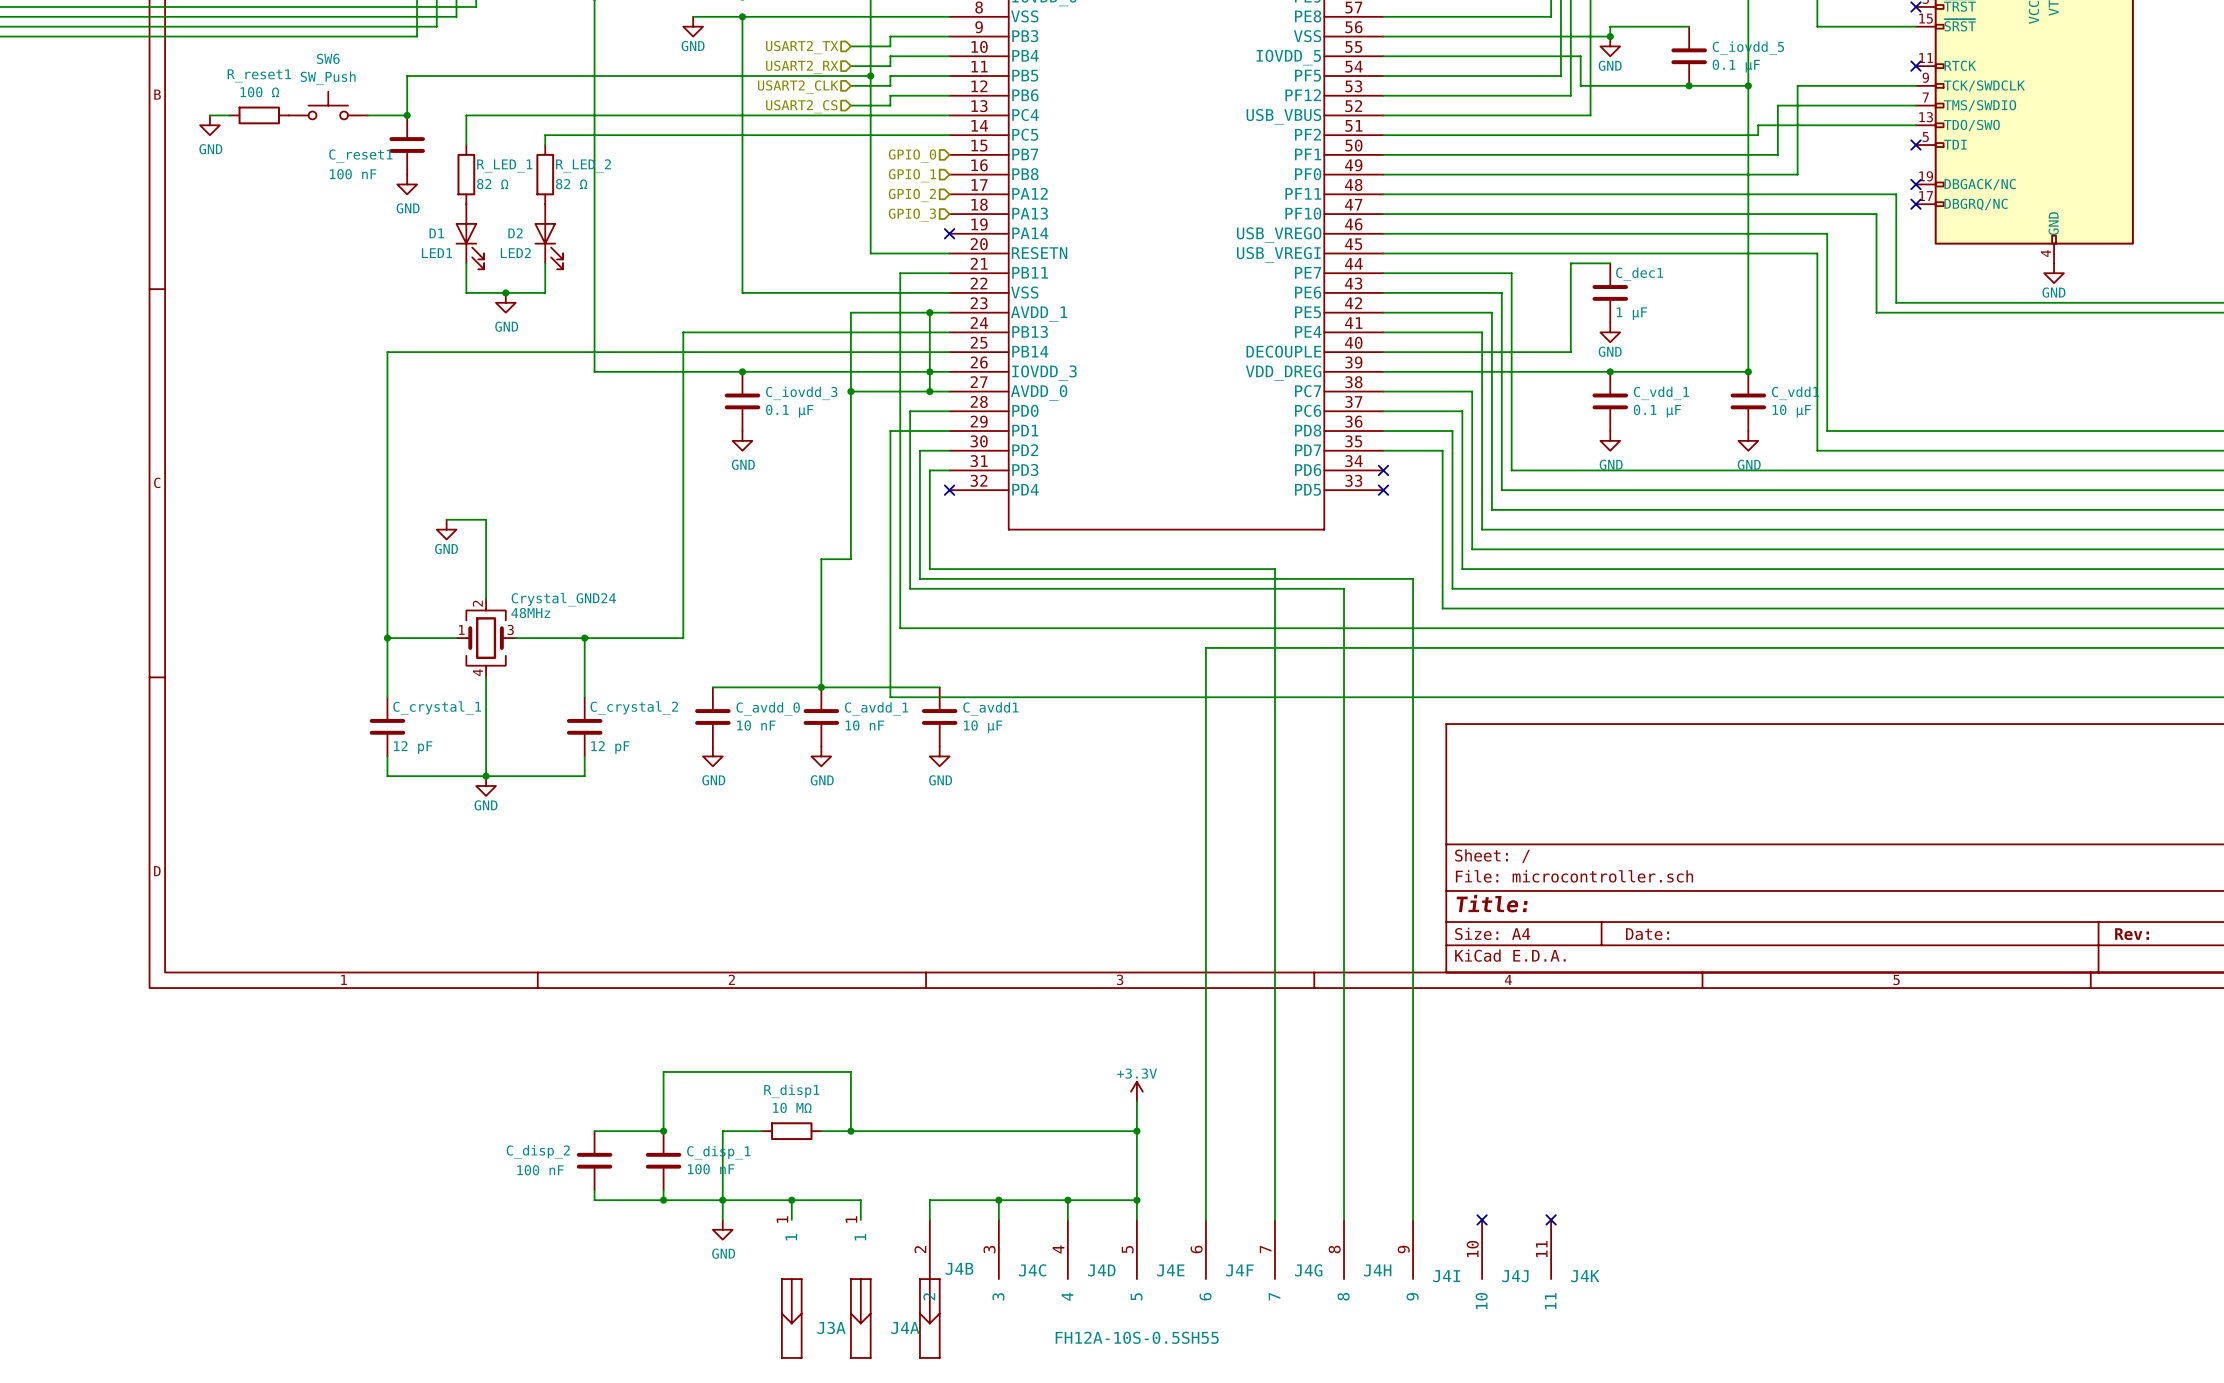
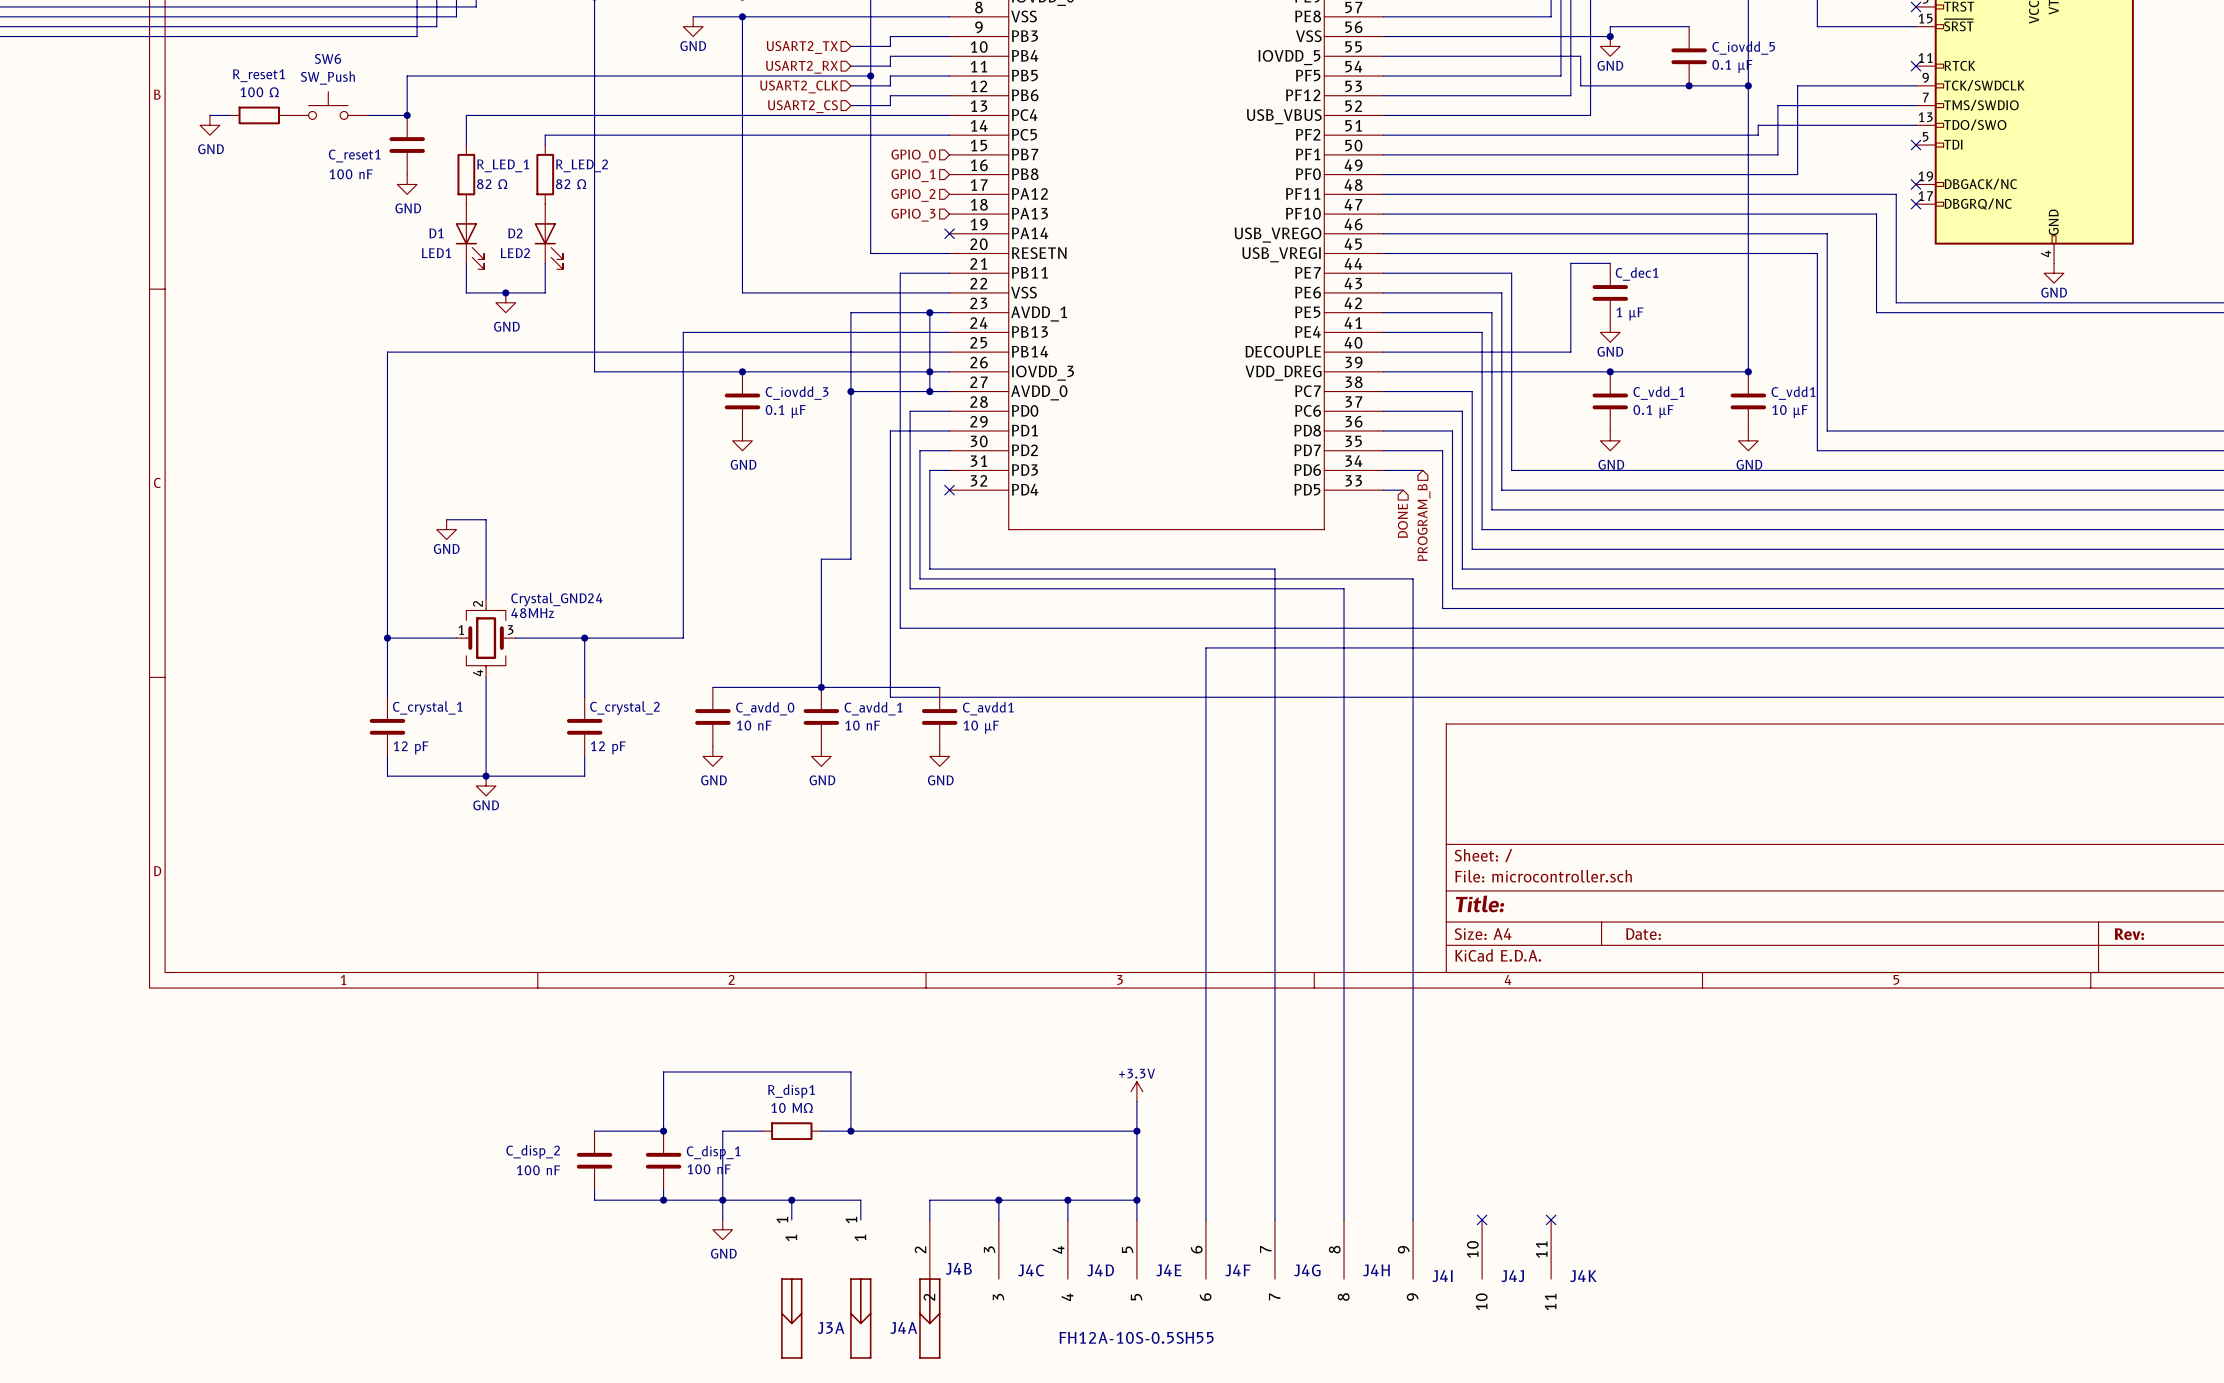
wire: none -> (1383, 470) (1422, 470)
no-connect mark: (1383, 470) -> none
wire: none -> (1383, 490) (1403, 490)
no-connect mark: (1383, 490) -> none
hierarchical label: none -> DONE (1402, 520)
hierarchical label: none -> PROGRAM_B (1424, 522)

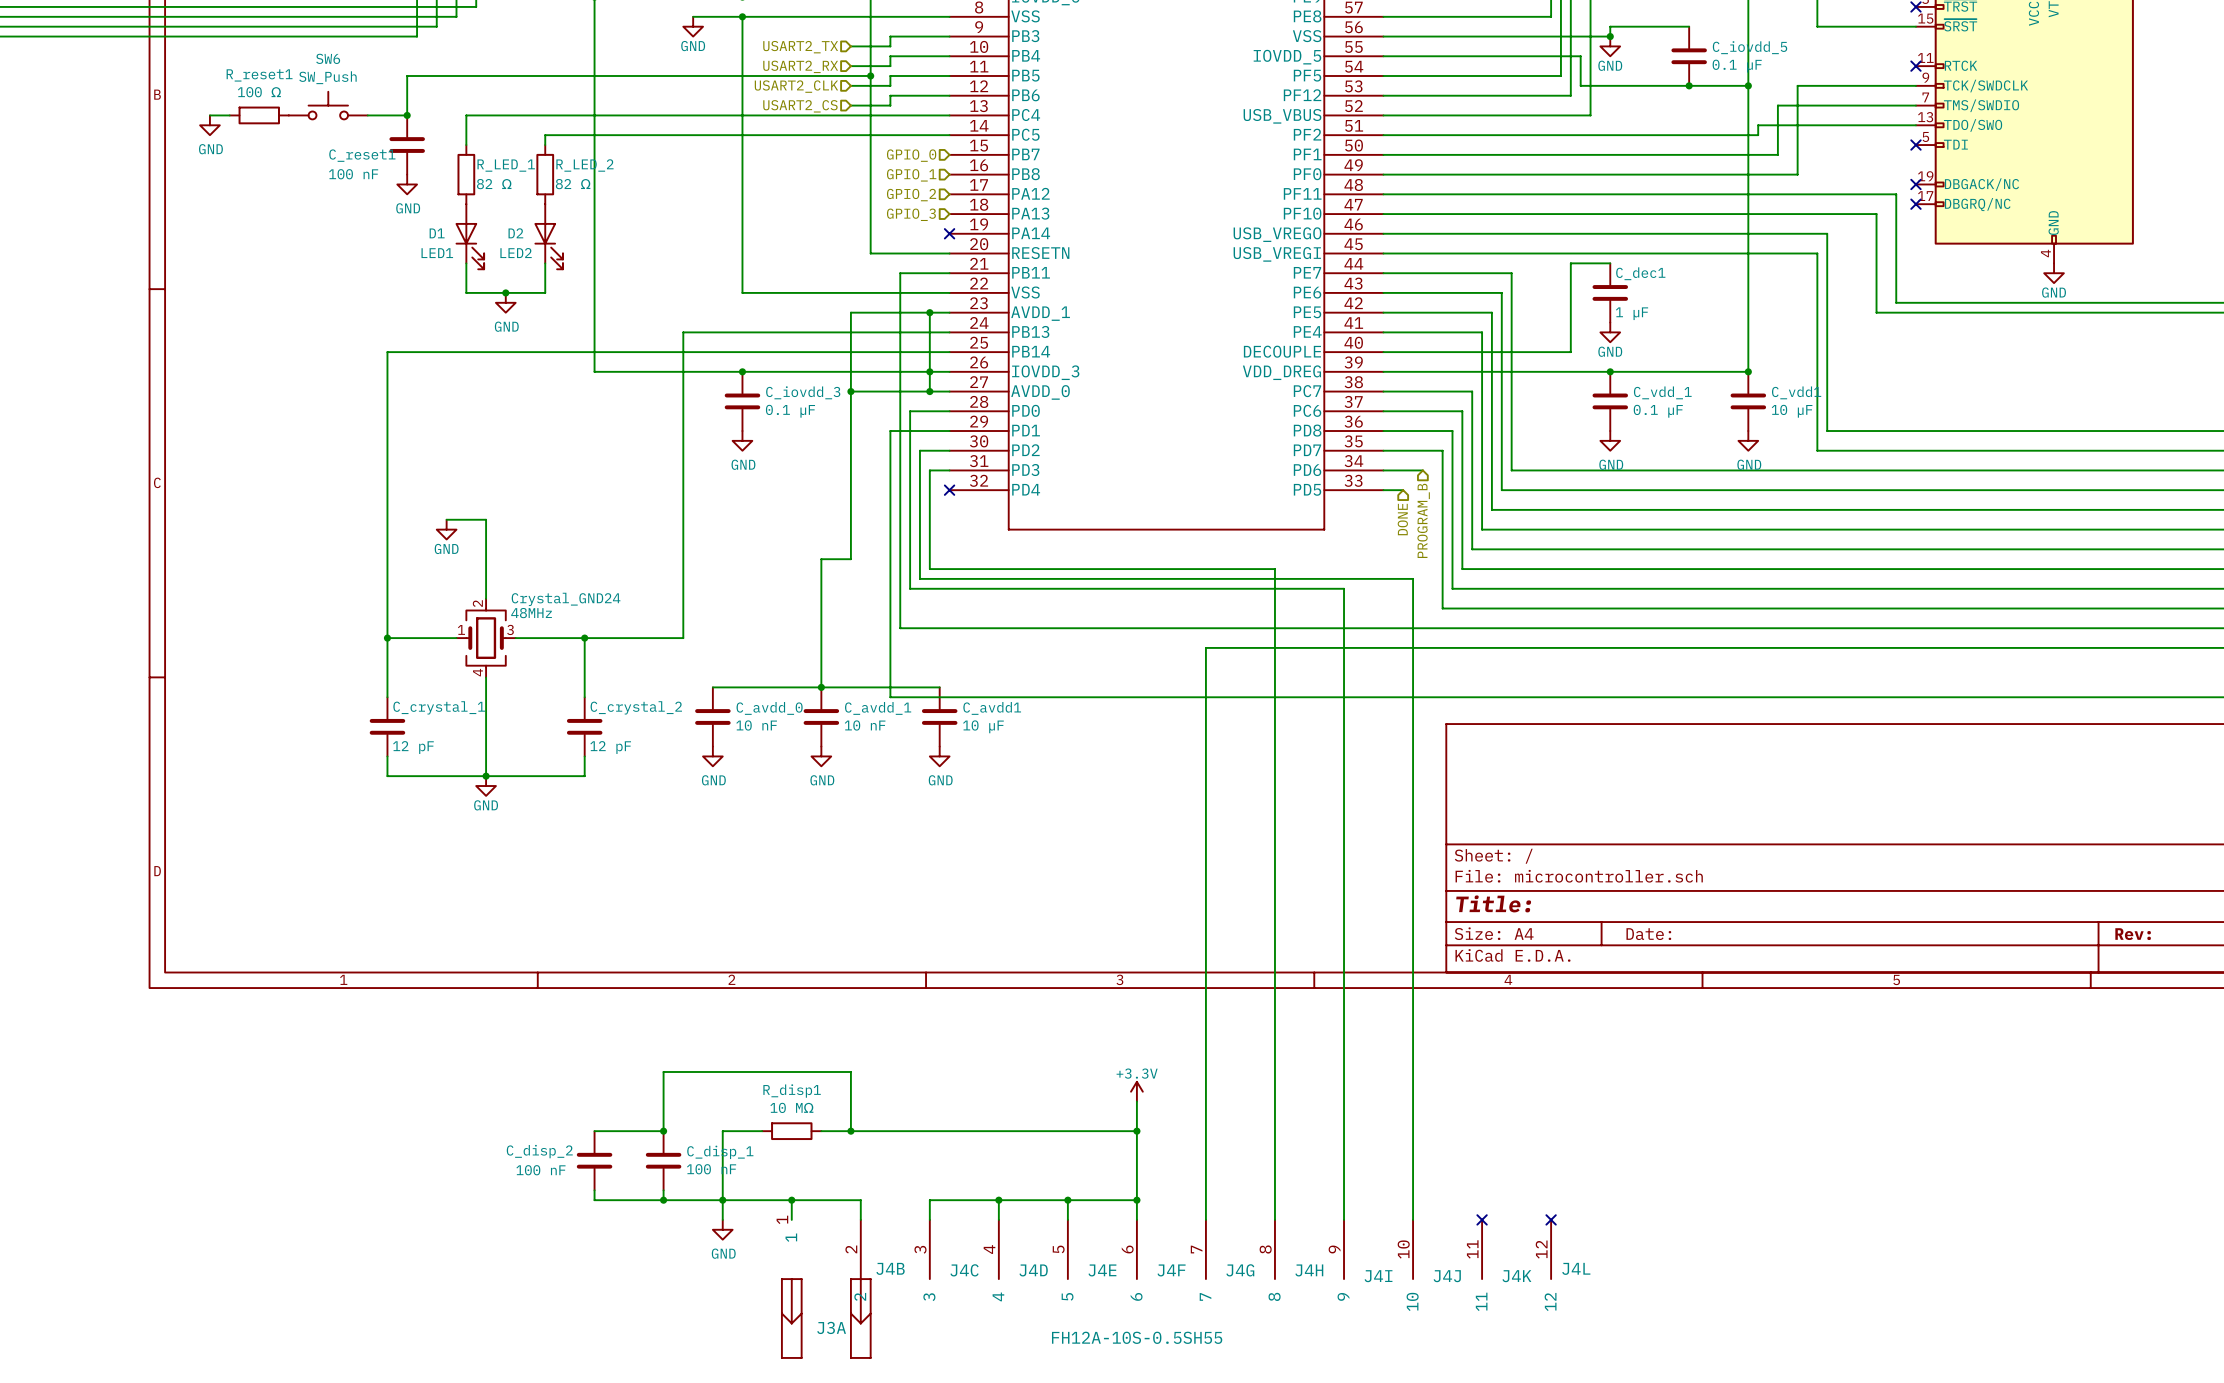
J4C position: (998, 1249) -> (929, 1249)
J4D position: (1067, 1249) -> (998, 1249)
J4E position: (1136, 1249) -> (1067, 1249)
J4F position: (1205, 1249) -> (1136, 1249)
J4G position: (1274, 1249) -> (1205, 1249)
J4H position: (1344, 1249) -> (1274, 1249)
J4I position: (1413, 1249) -> (1344, 1249)
J4J position: (1482, 1249) -> (1413, 1249)
J4K position: (1551, 1249) -> (1482, 1249)
J4L: none -> (1551, 1249)
J4B position: (929, 1289) -> (860, 1289)
J4A: (860, 1318) -> none

